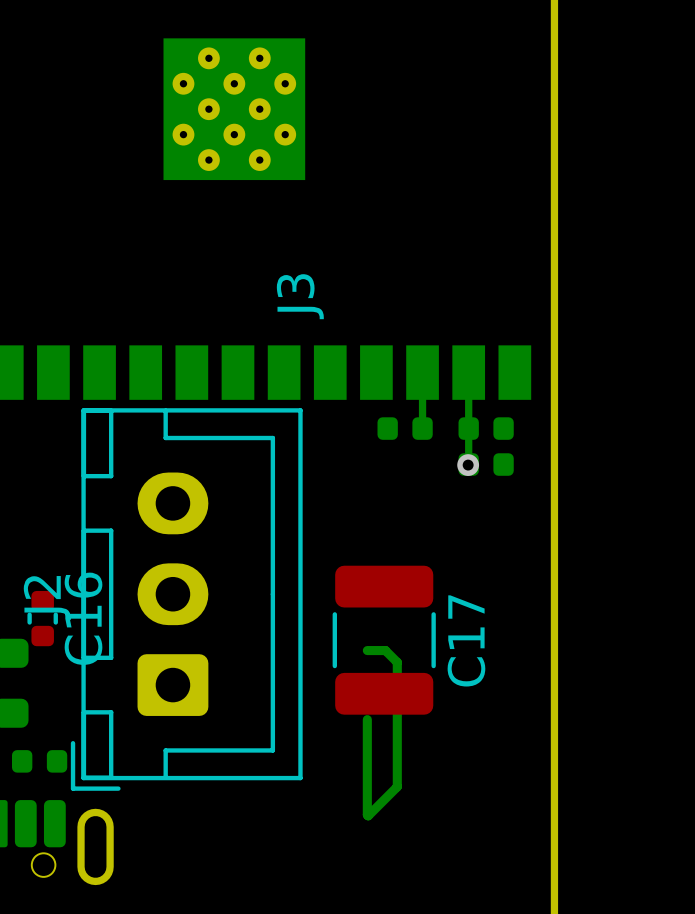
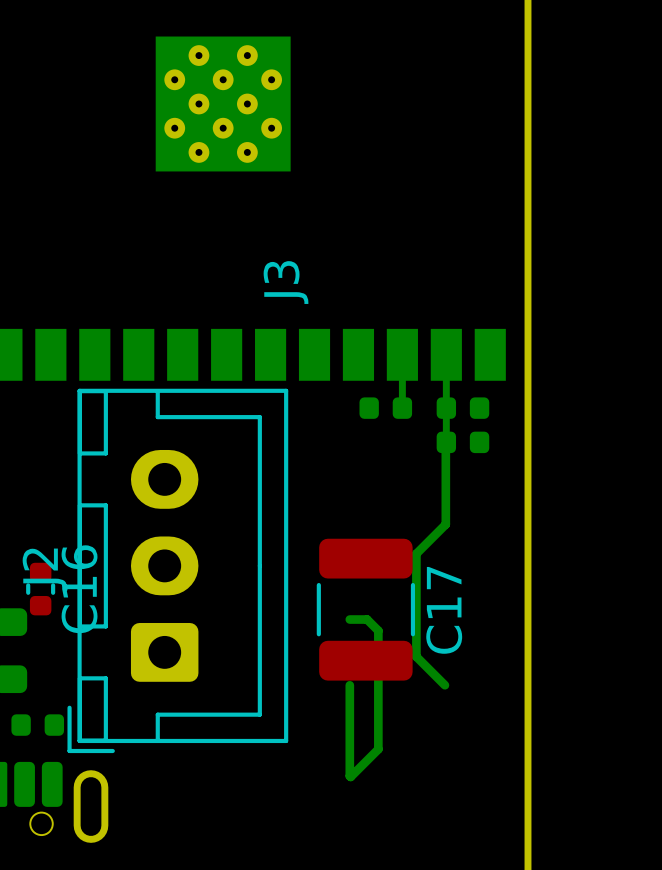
bottom track: none -> (445, 442) (445, 524) (416, 553) (416, 656) (444, 685)
via: (468, 465) -> none

